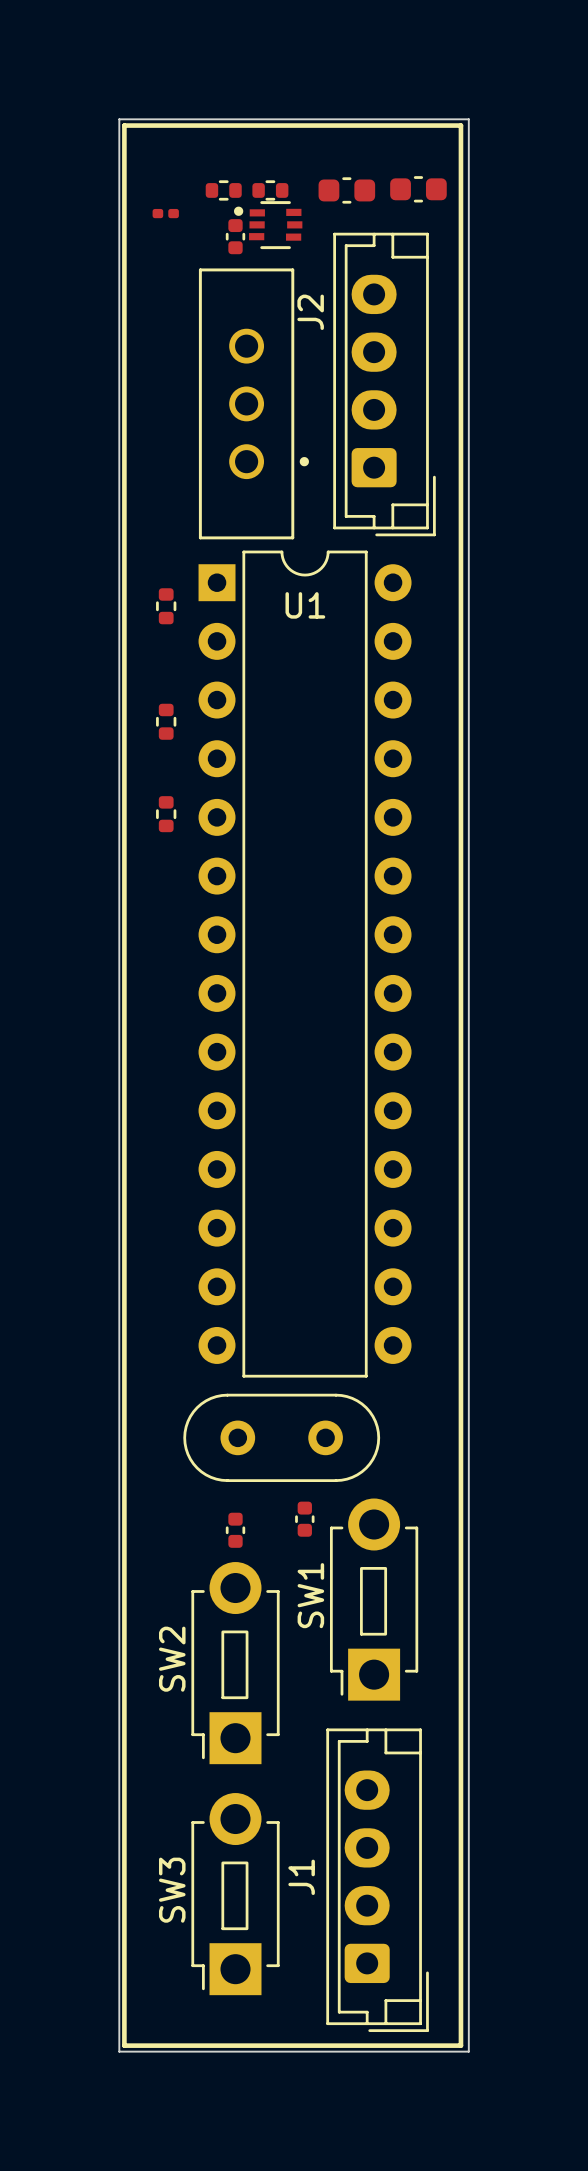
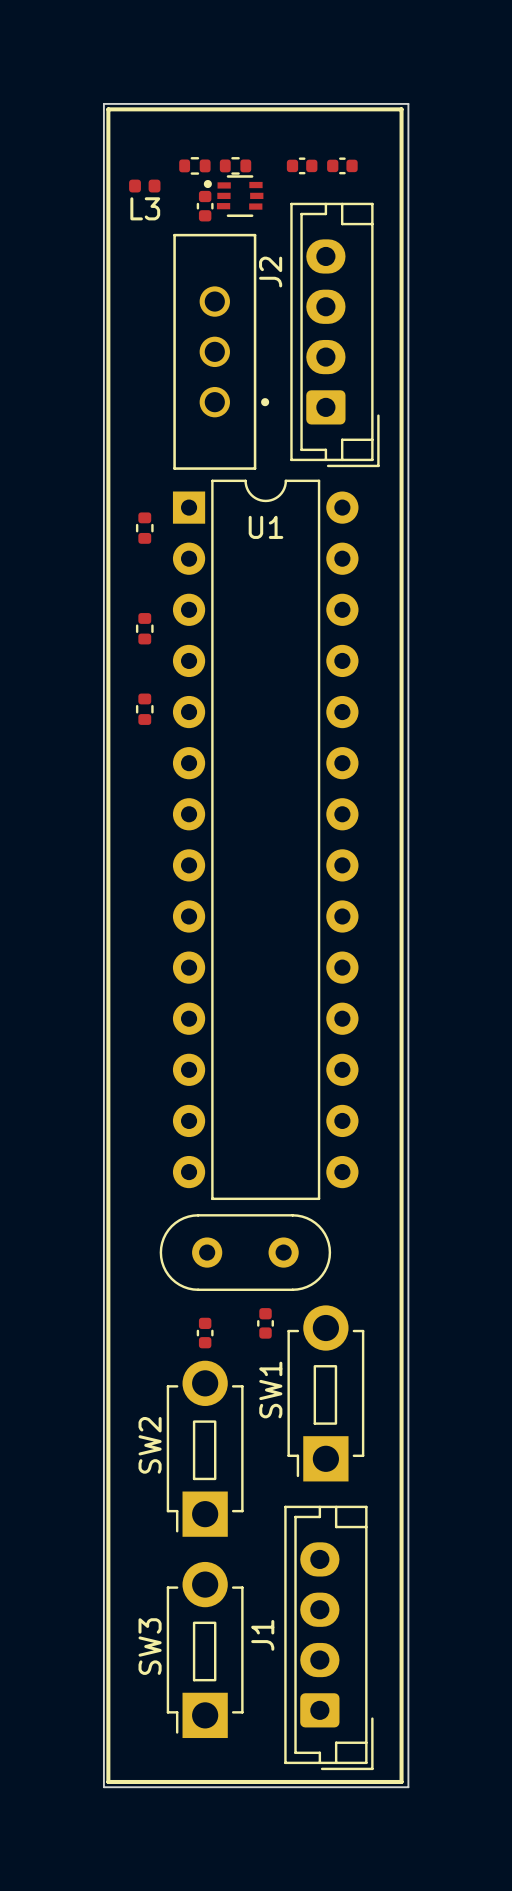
part footprint: [318, 177, 376, 204] -> [286, 157, 318, 175]
part: (418, 189) -> none
part: none -> (342, 165)
part: (165, 213) -> none
L3: none -> (144, 186)

